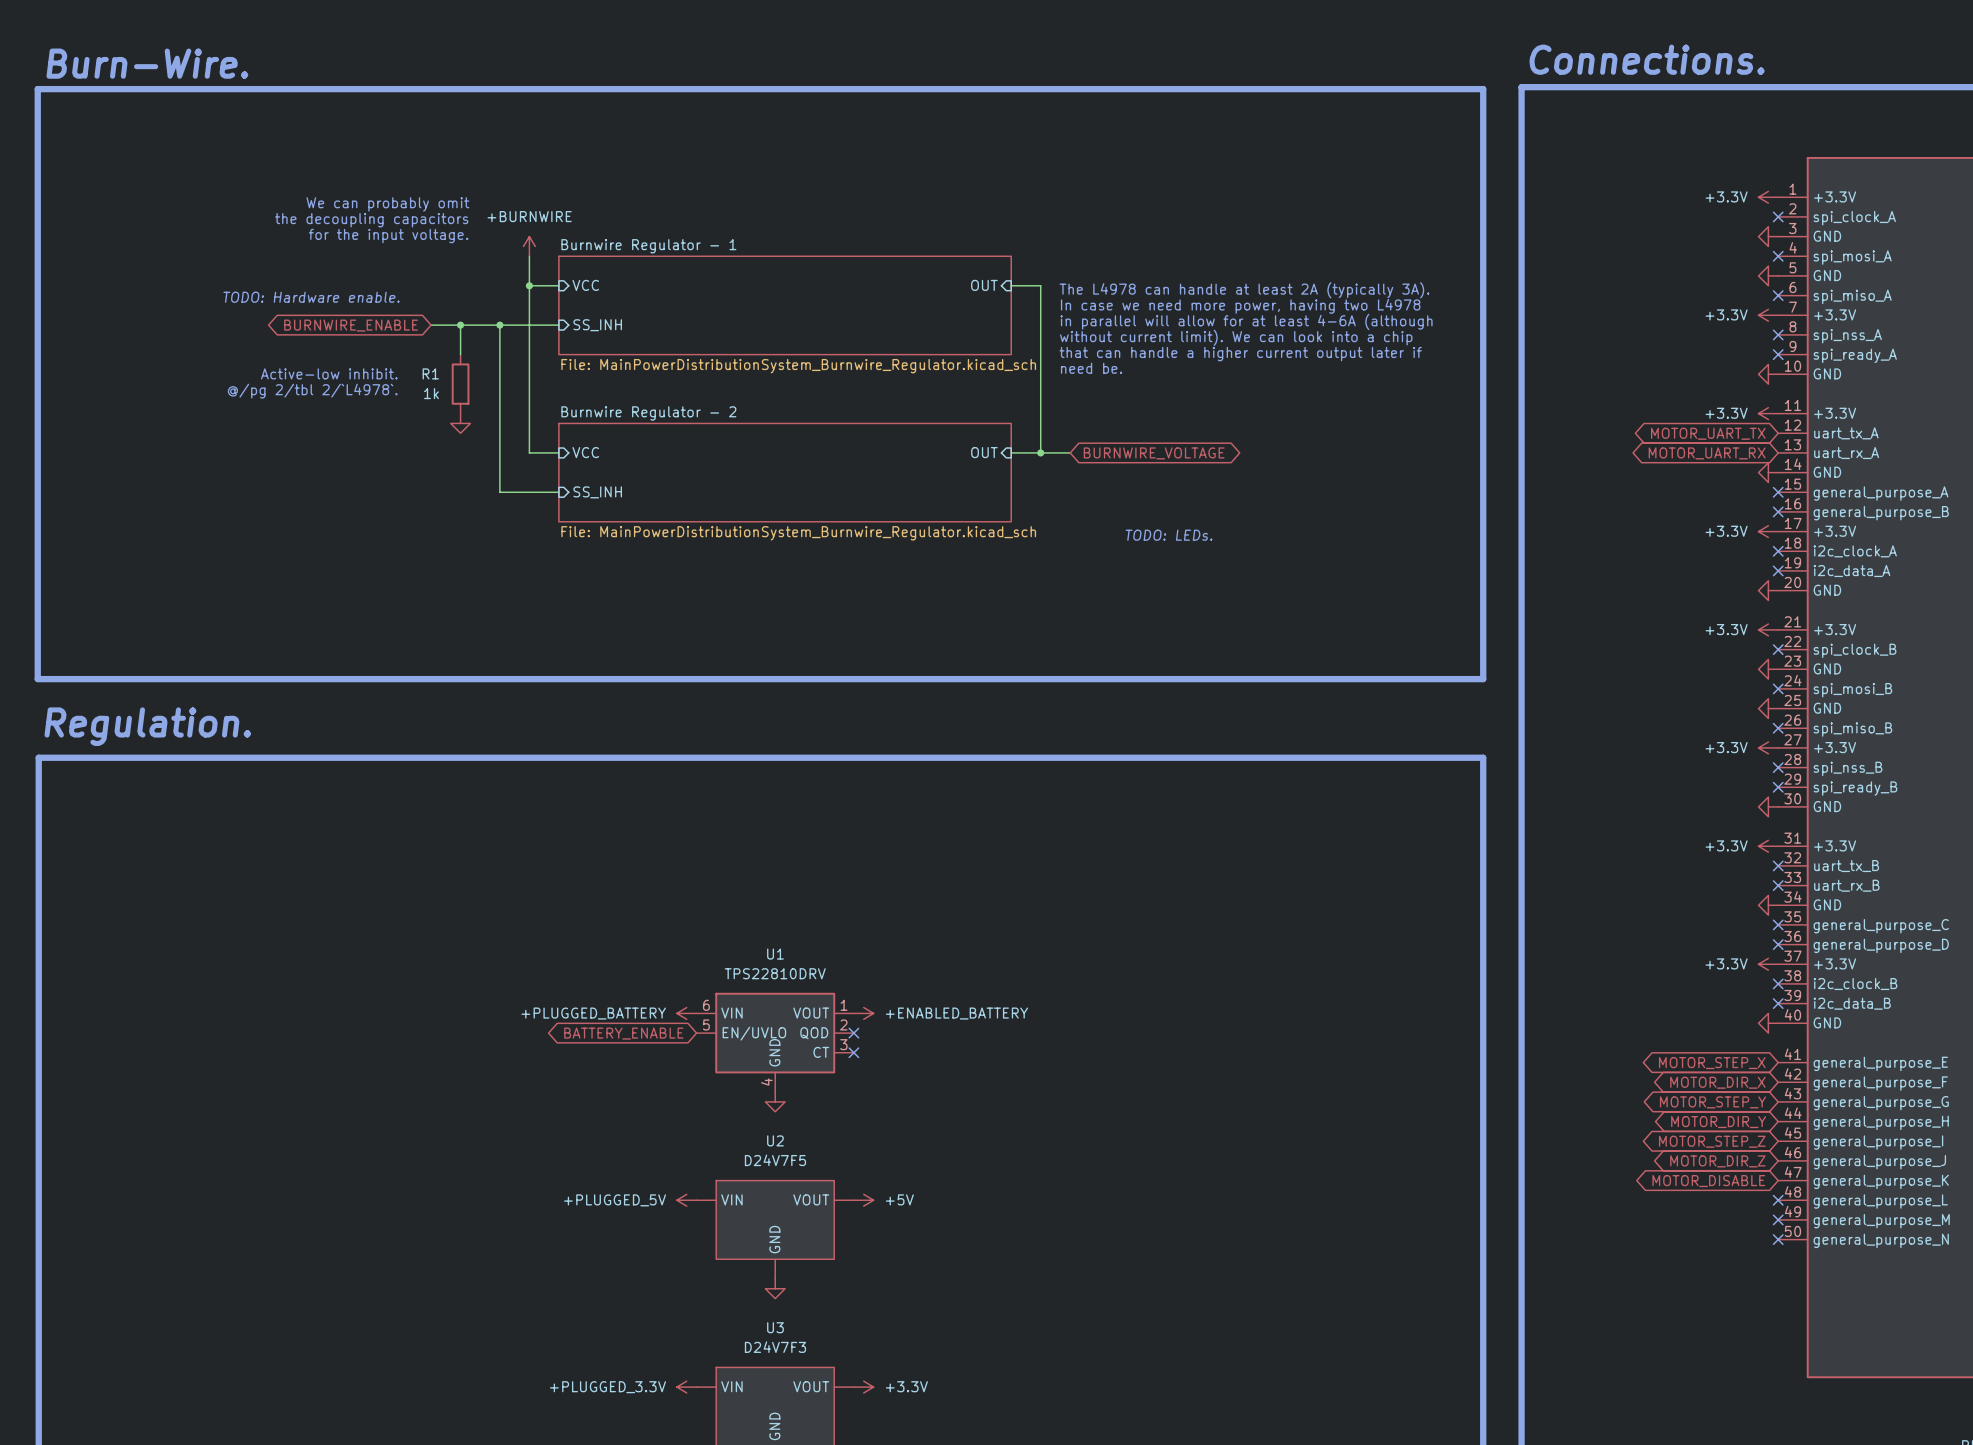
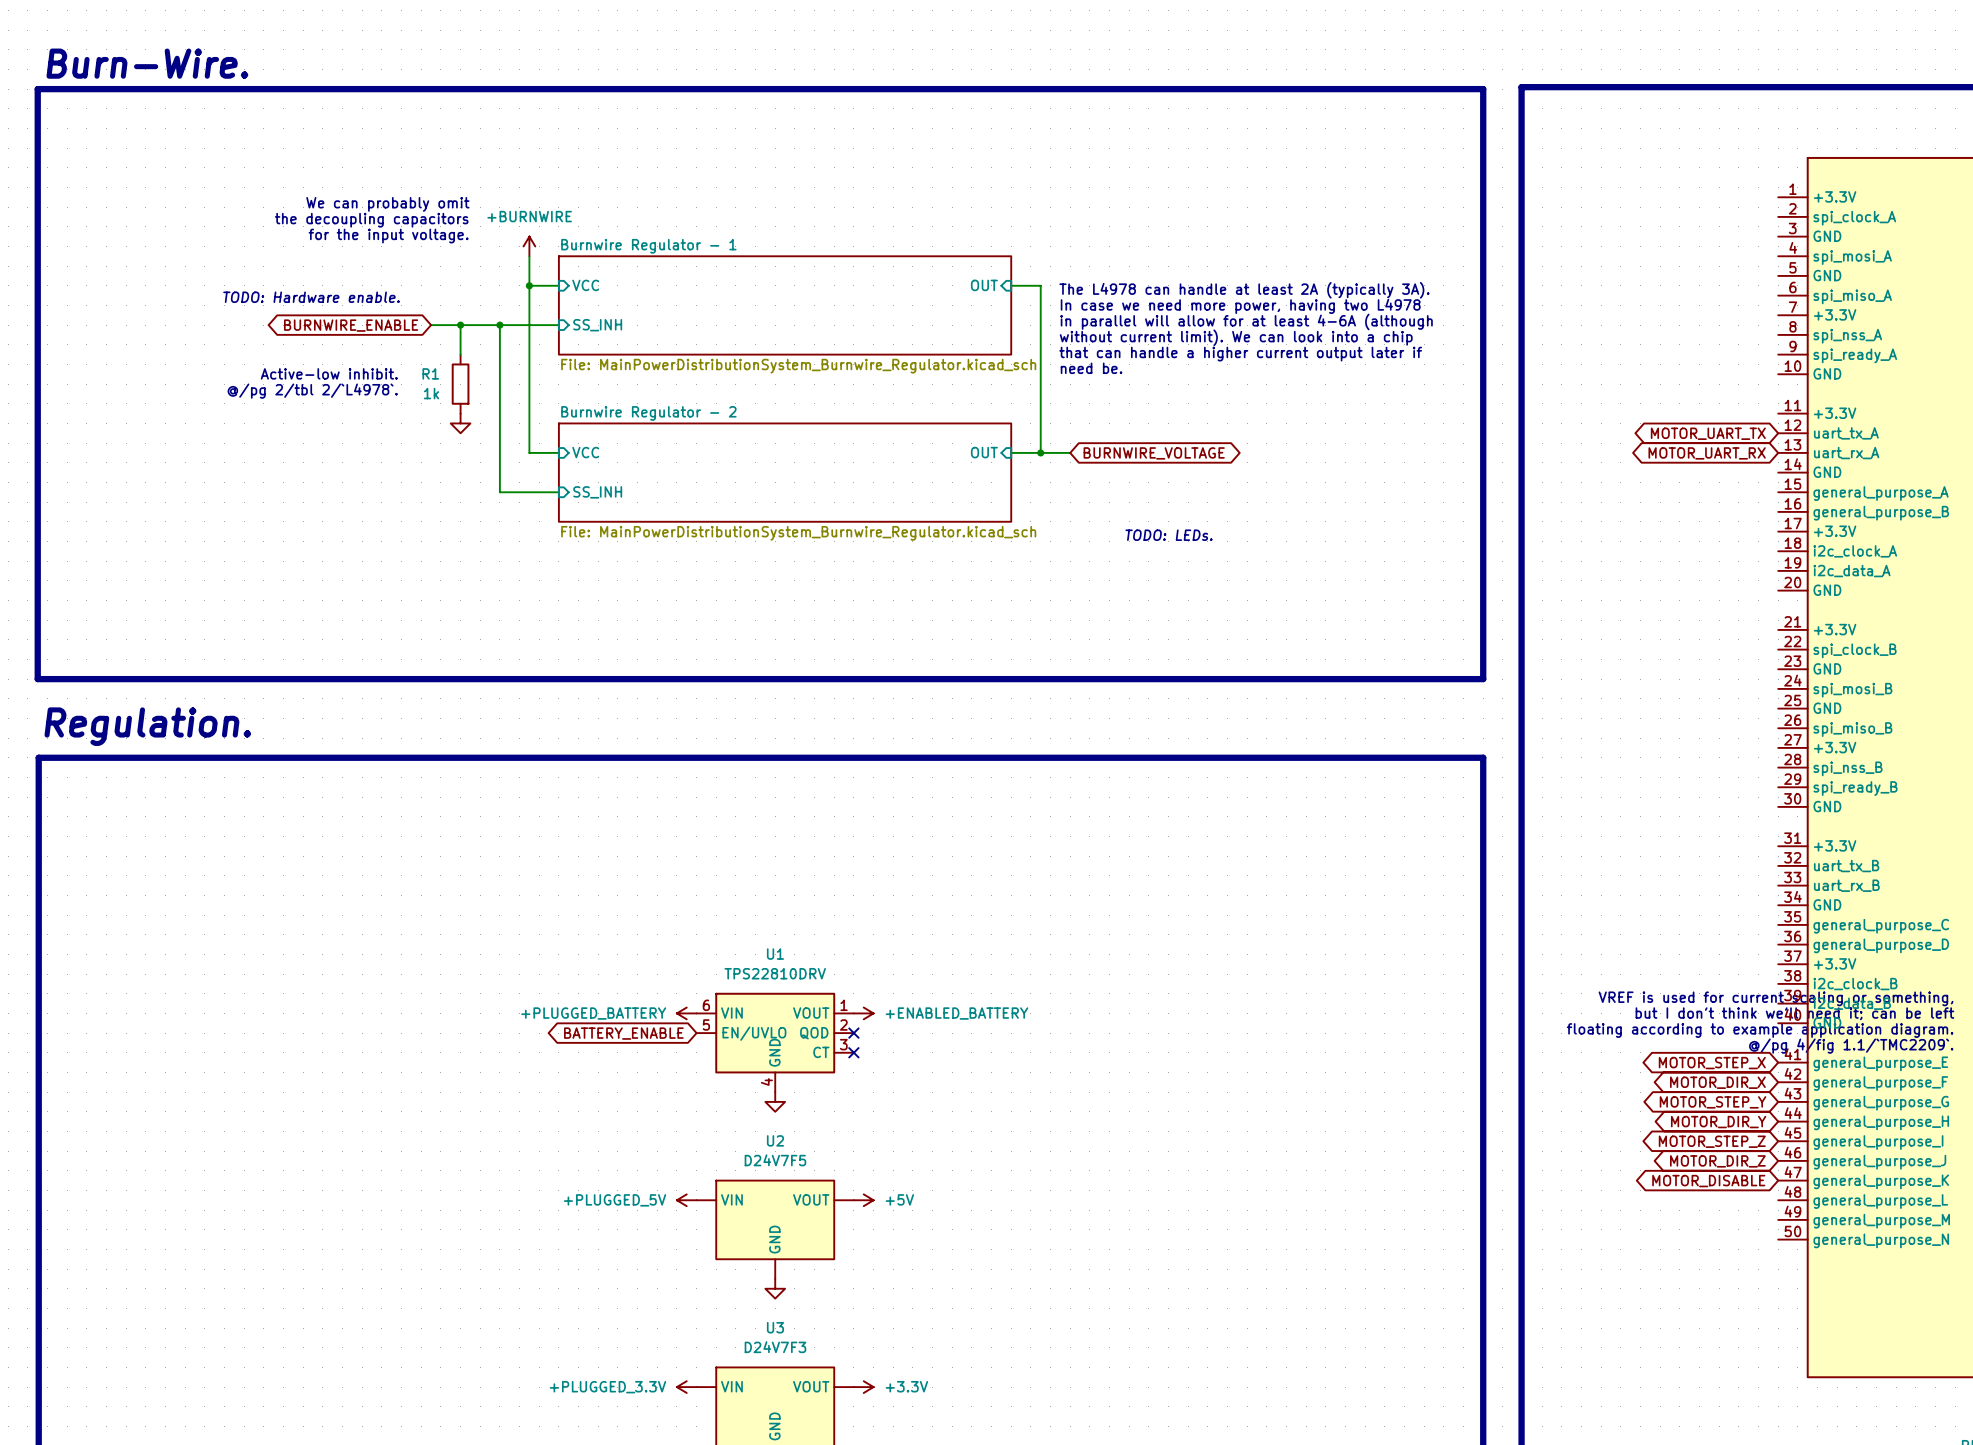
text: Connections. (1647, 59) -> none
power symbol: +3.3V (1768, 197) -> none
no-connect mark: (1778, 216) -> none
power symbol: (1768, 236) -> none
no-connect mark: (1778, 256) -> none
power symbol: (1768, 275) -> none
no-connect mark: (1778, 295) -> none
power symbol: +3.3V (1768, 315) -> none
no-connect mark: (1778, 334) -> none
no-connect mark: (1778, 354) -> none
power symbol: (1768, 374) -> none
power symbol: +3.3V (1768, 413) -> none
power symbol: (1768, 472) -> none
no-connect mark: (1778, 492) -> none
no-connect mark: (1778, 511) -> none
power symbol: +3.3V (1768, 531) -> none
no-connect mark: (1778, 551) -> none
no-connect mark: (1778, 570) -> none
power symbol: (1768, 590) -> none
power symbol: +3.3V (1768, 629) -> none
no-connect mark: (1778, 649) -> none
power symbol: (1768, 669) -> none
no-connect mark: (1778, 688) -> none
power symbol: (1768, 708) -> none
no-connect mark: (1778, 728) -> none
power symbol: +3.3V (1768, 747) -> none
no-connect mark: (1778, 767) -> none
no-connect mark: (1778, 787) -> none
power symbol: (1768, 806) -> none
power symbol: +3.3V (1768, 846) -> none
no-connect mark: (1778, 865) -> none
no-connect mark: (1778, 885) -> none
power symbol: (1768, 905) -> none
no-connect mark: (1778, 924) -> none
no-connect mark: (1778, 944) -> none
power symbol: +3.3V (1768, 964) -> none
no-connect mark: (1778, 983) -> none
text: none -> VREF is used for current scaling or something, (1775, 998)
no-connect mark: (1778, 1003) -> none
text: none -> but I don't think we'll need it; can be left (1794, 1013)
power symbol: (1768, 1023) -> none
text: none -> floating according to example application diagram. (1760, 1030)
text: none -> @/pg 4/fig 1.1/`TMC2209`. (1851, 1046)
no-connect mark: (1778, 1200) -> none
no-connect mark: (1778, 1219) -> none
no-connect mark: (1778, 1239) -> none

